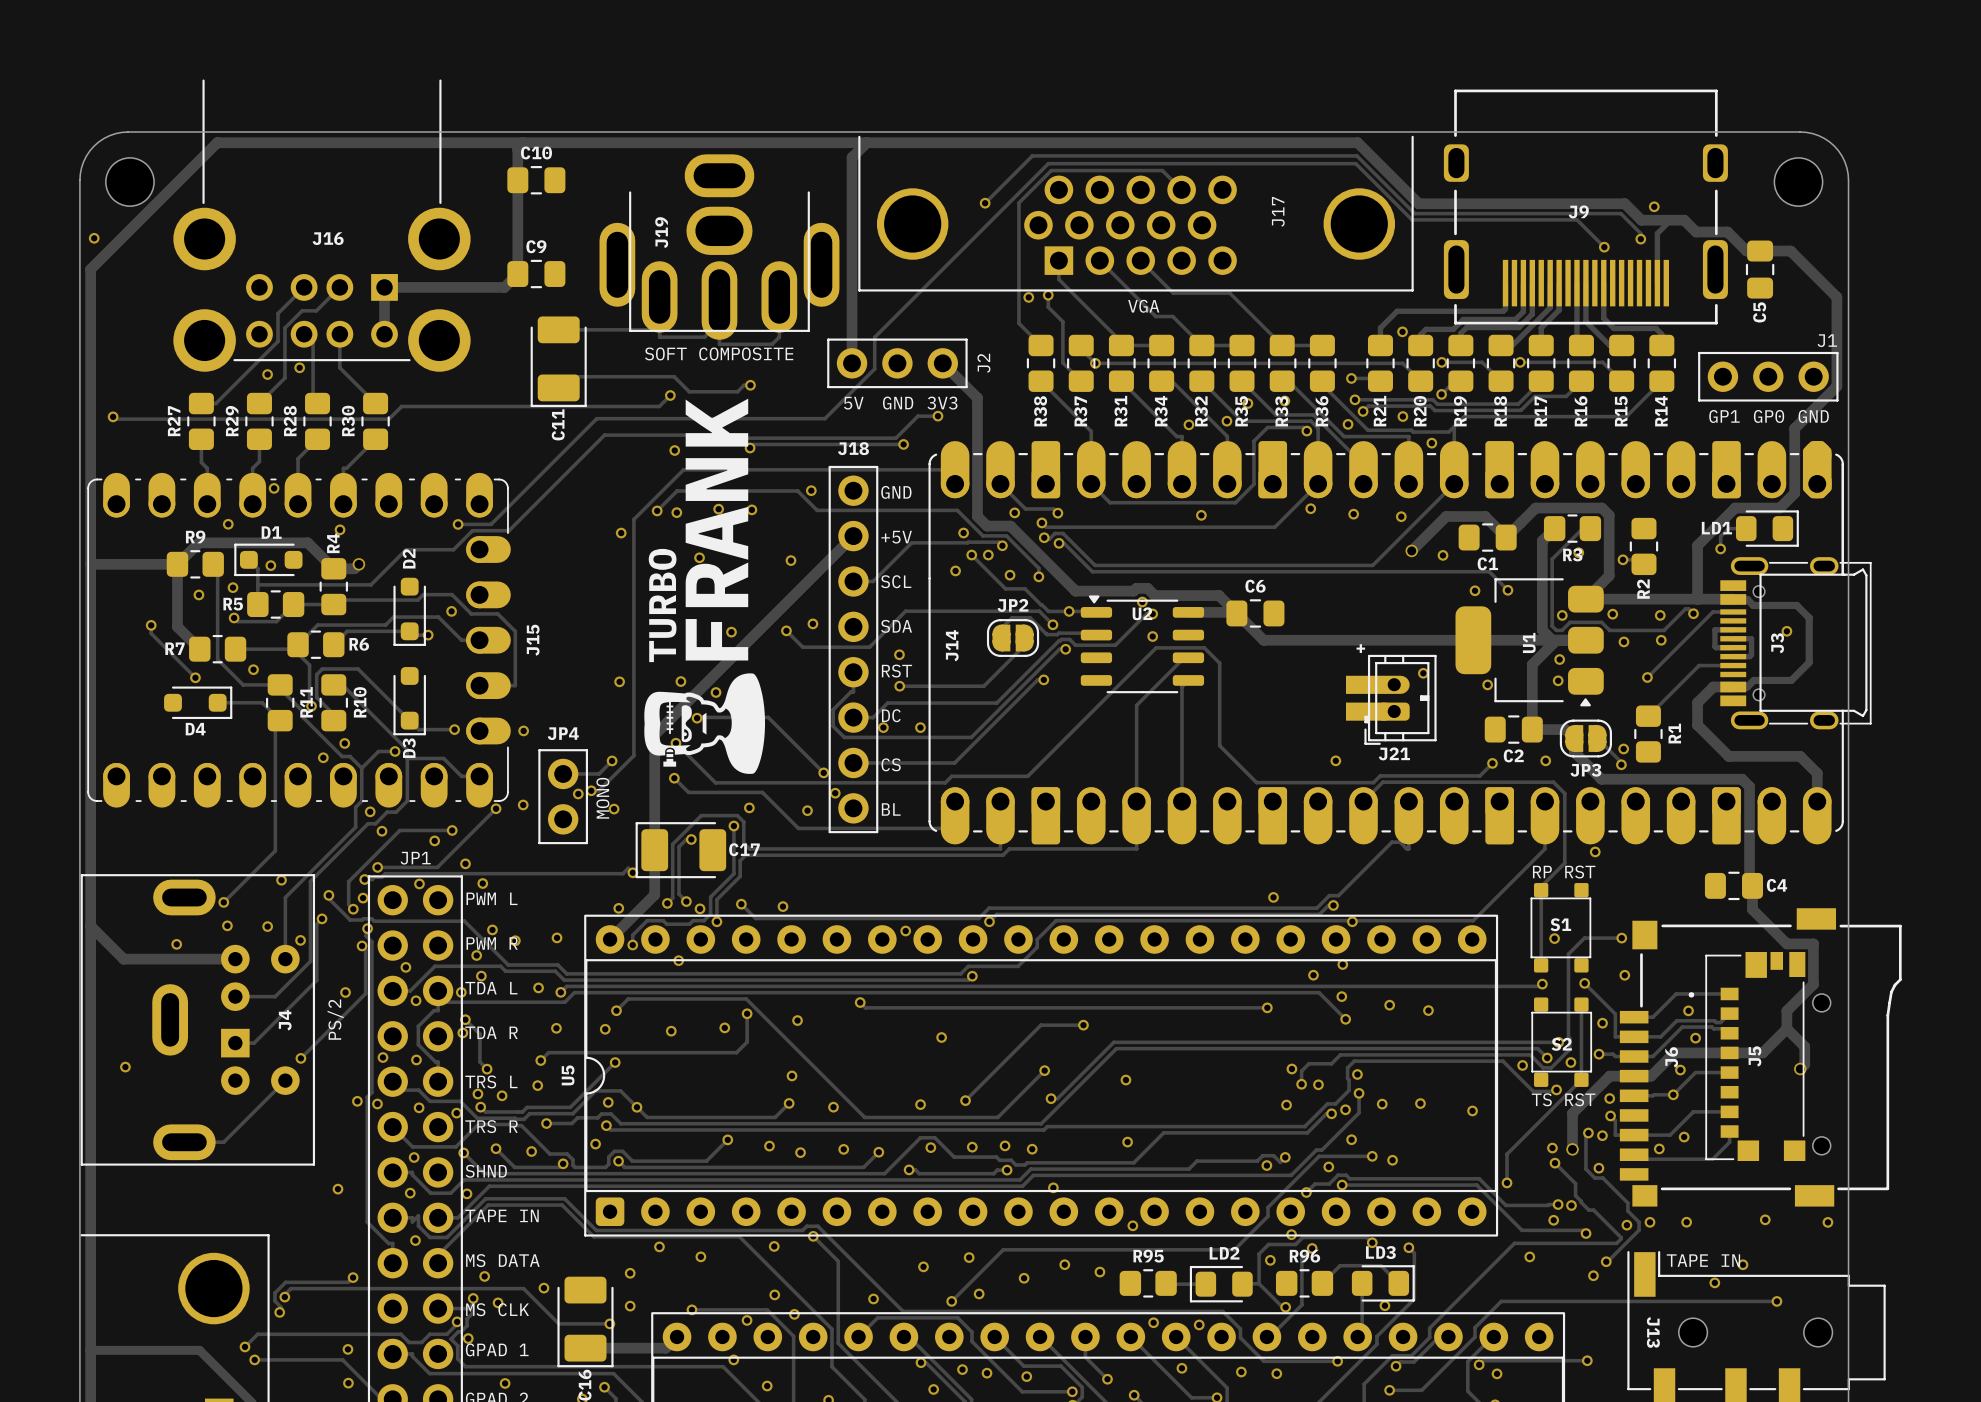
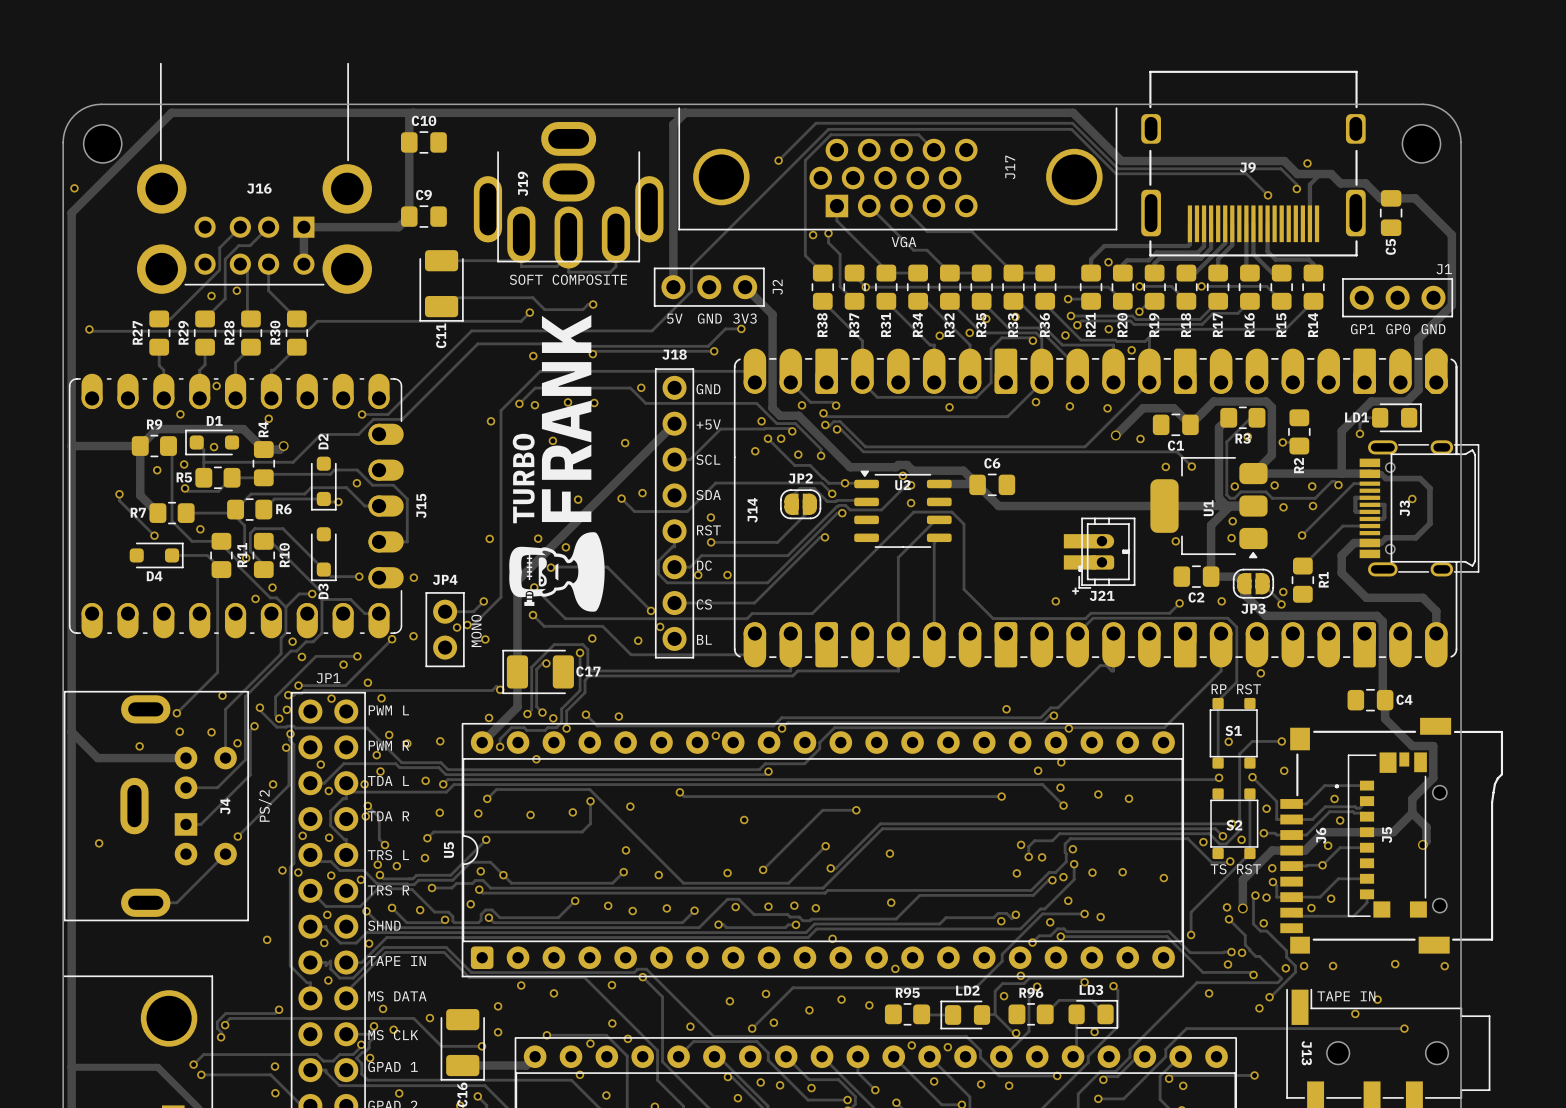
text position: + (1360, 648) -> + (1075, 591)
via: (1423, 673) -> none

